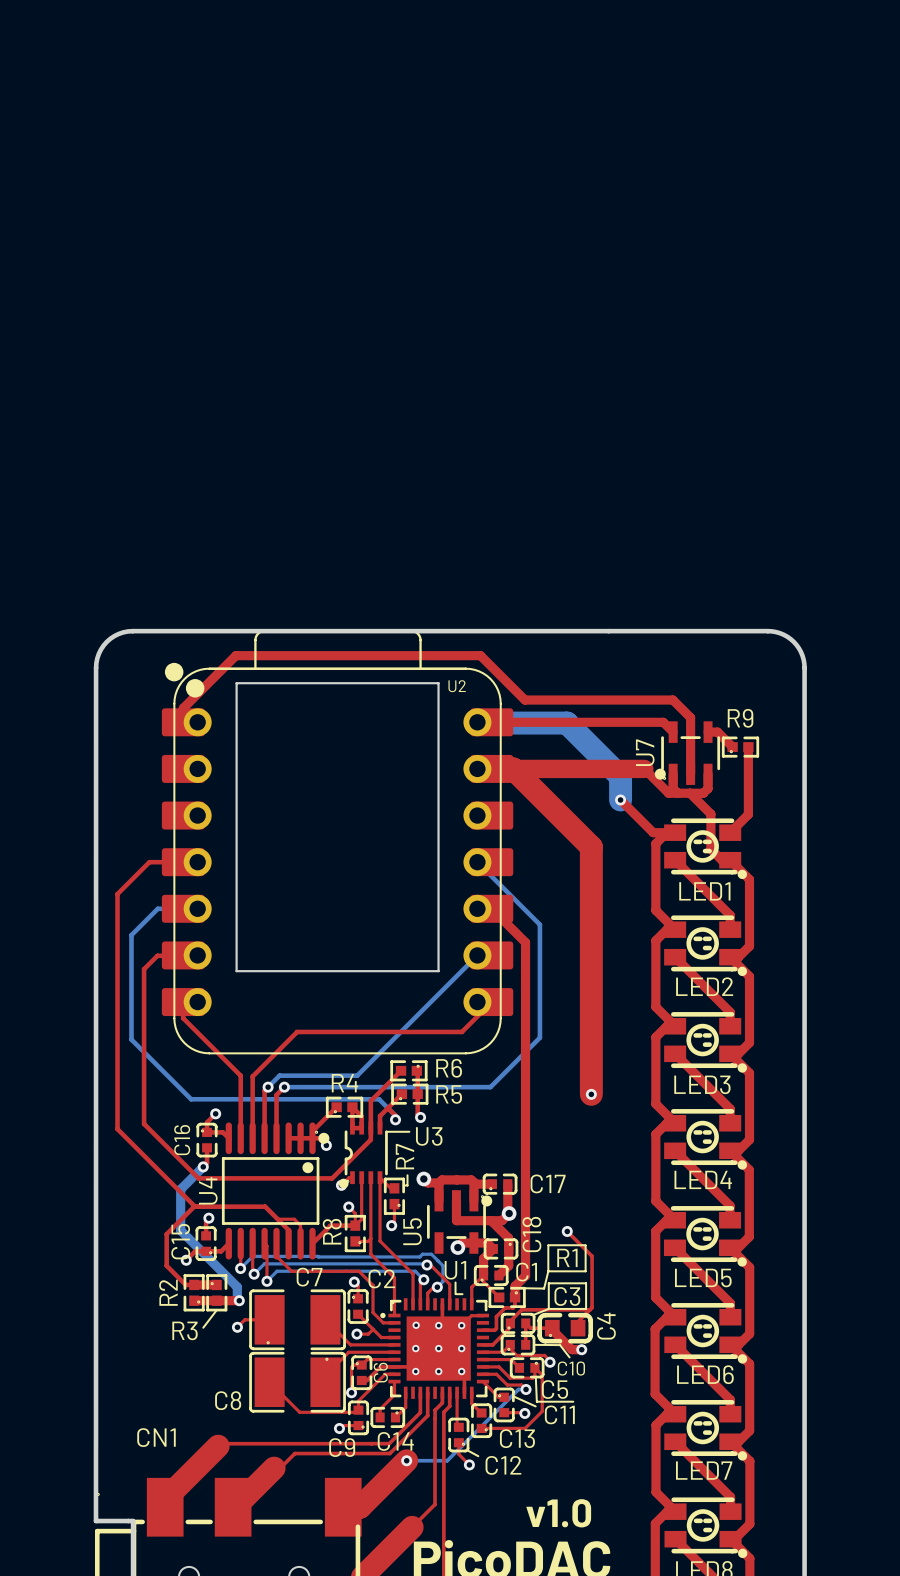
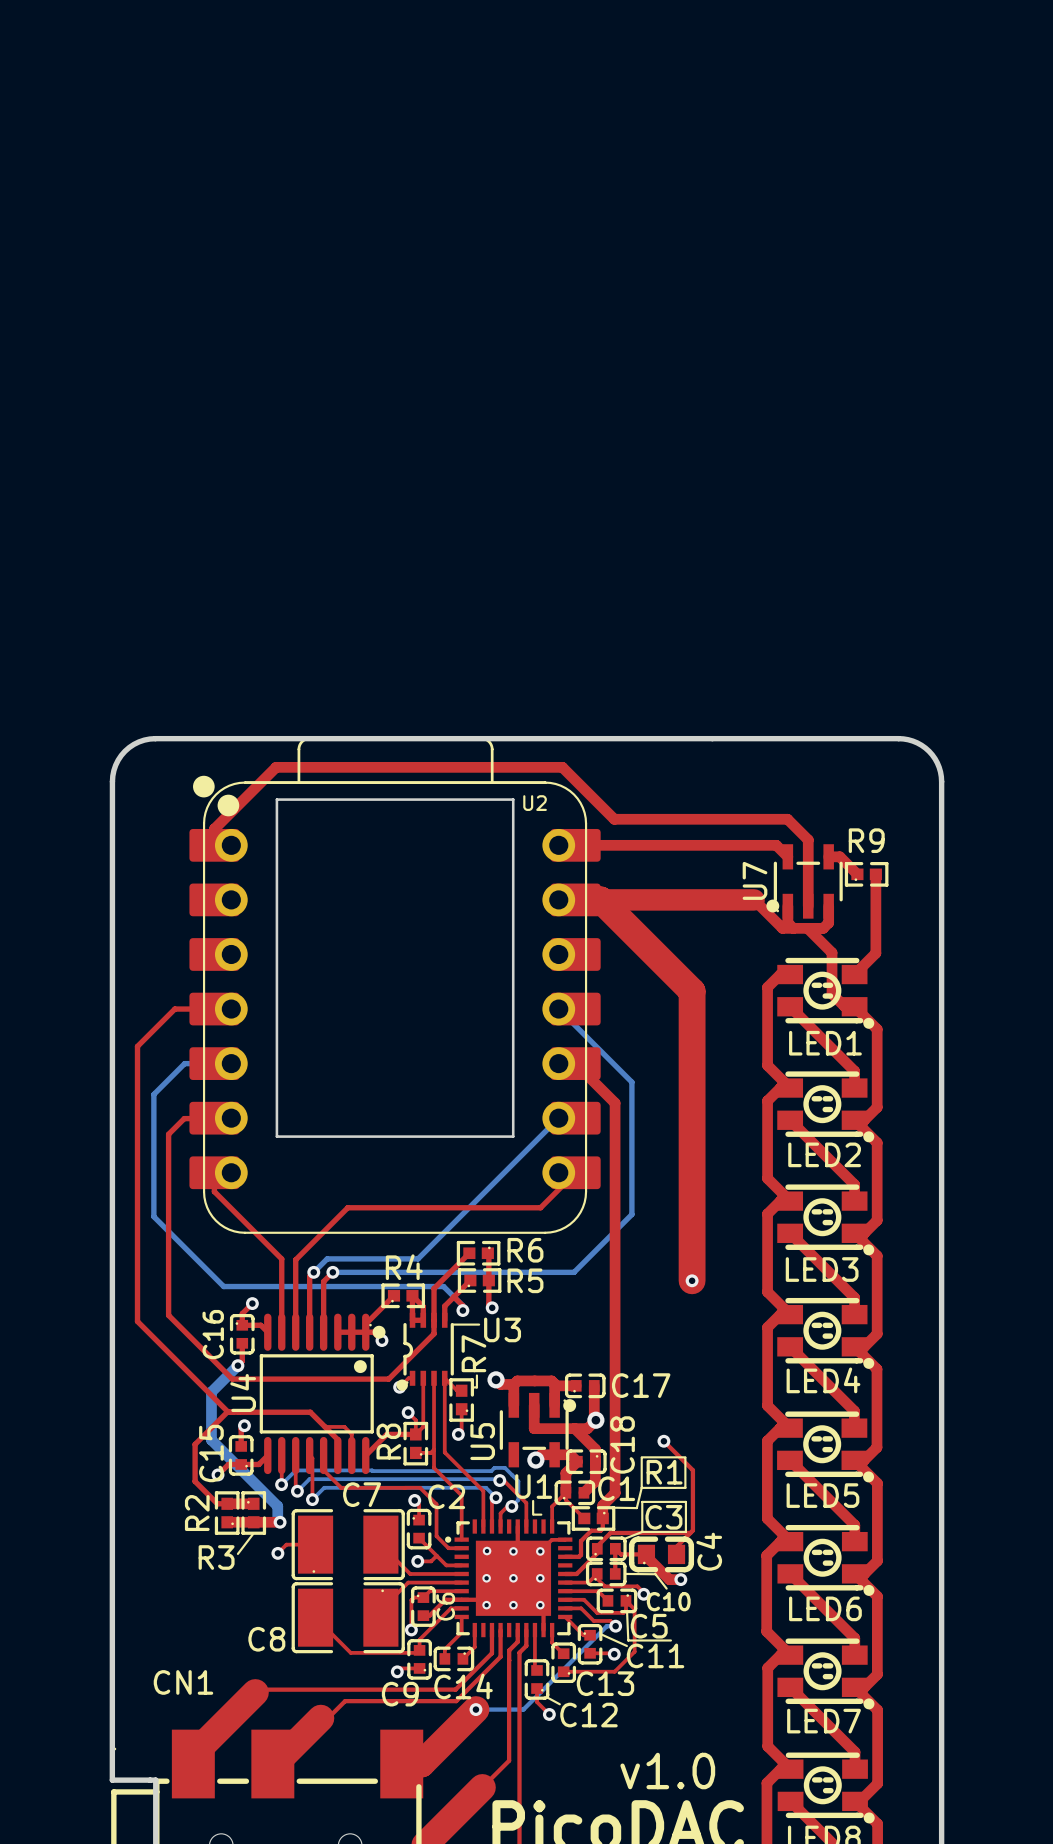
bottom track: (477, 722) (566, 723) (620, 776) (620, 799) -> none
top track: (620, 799) (653, 832) (666, 832) -> none
via: (620, 799) -> none

